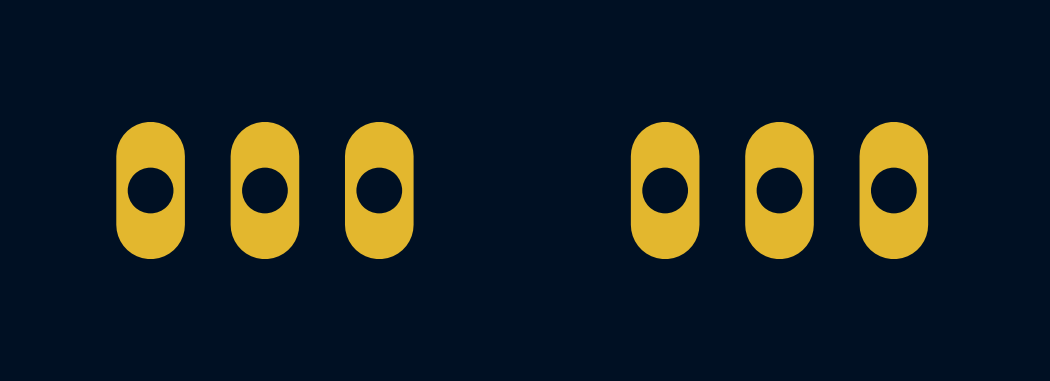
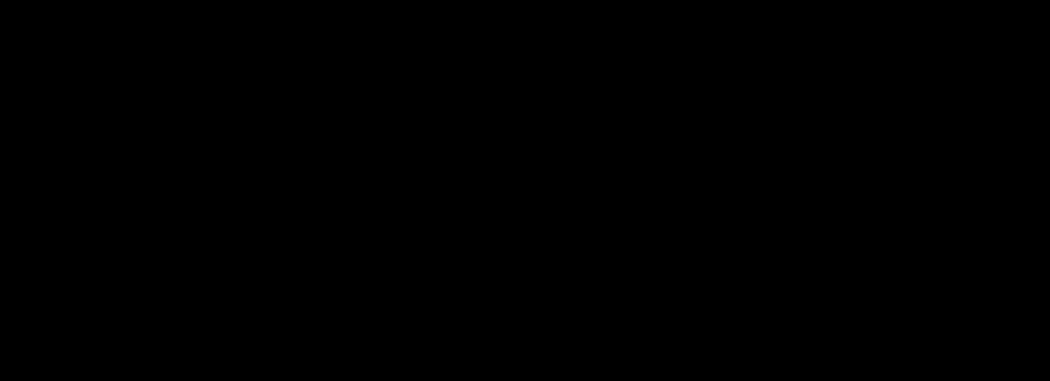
part: (264, 190) -> none
part: (779, 190) -> none

